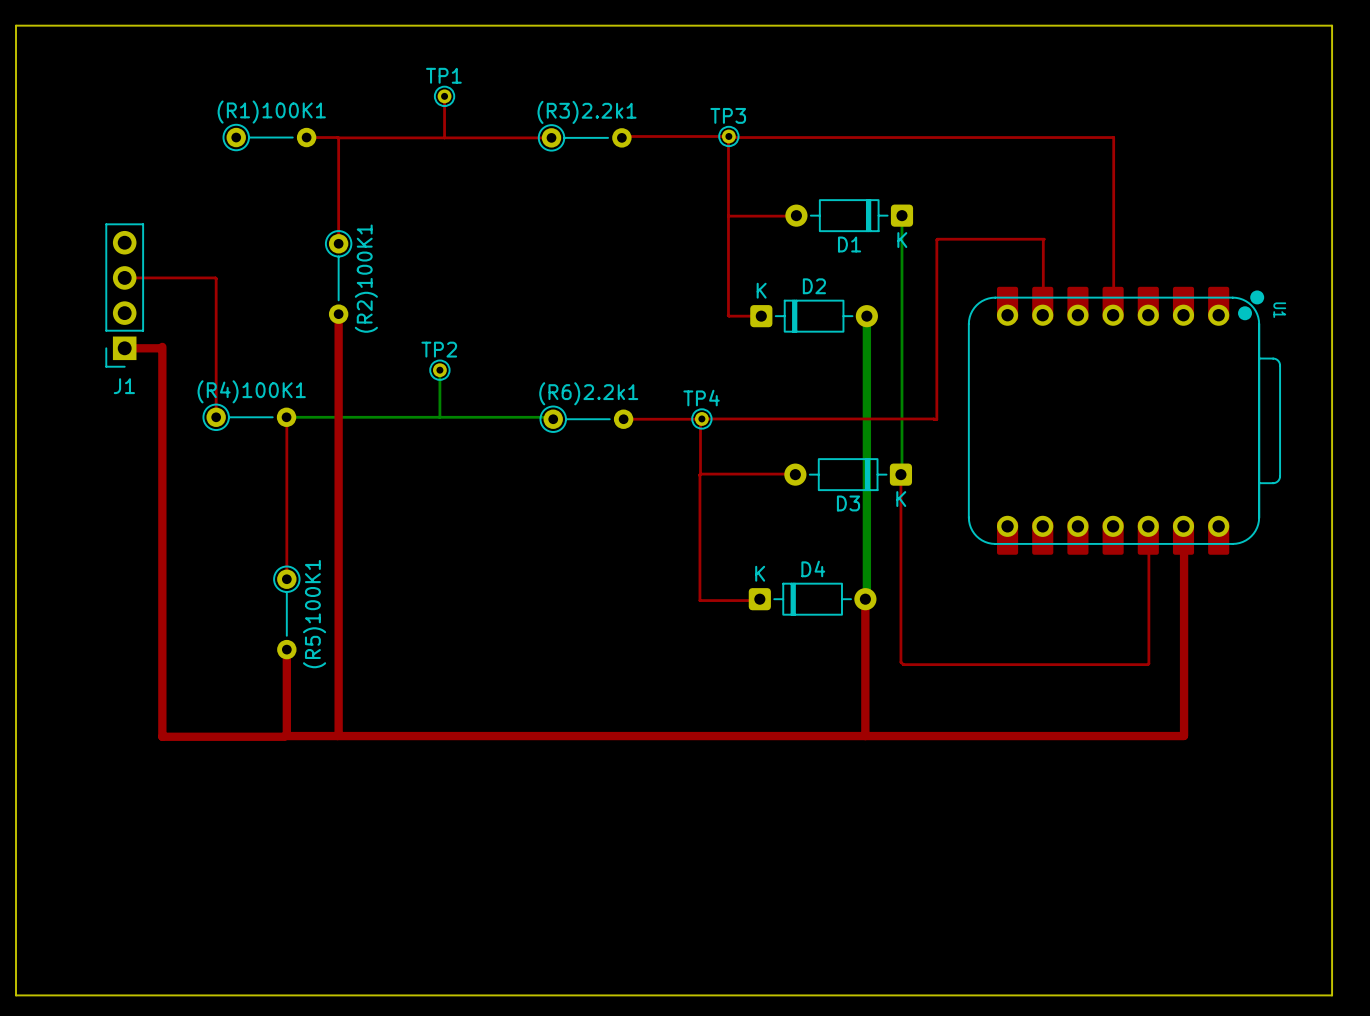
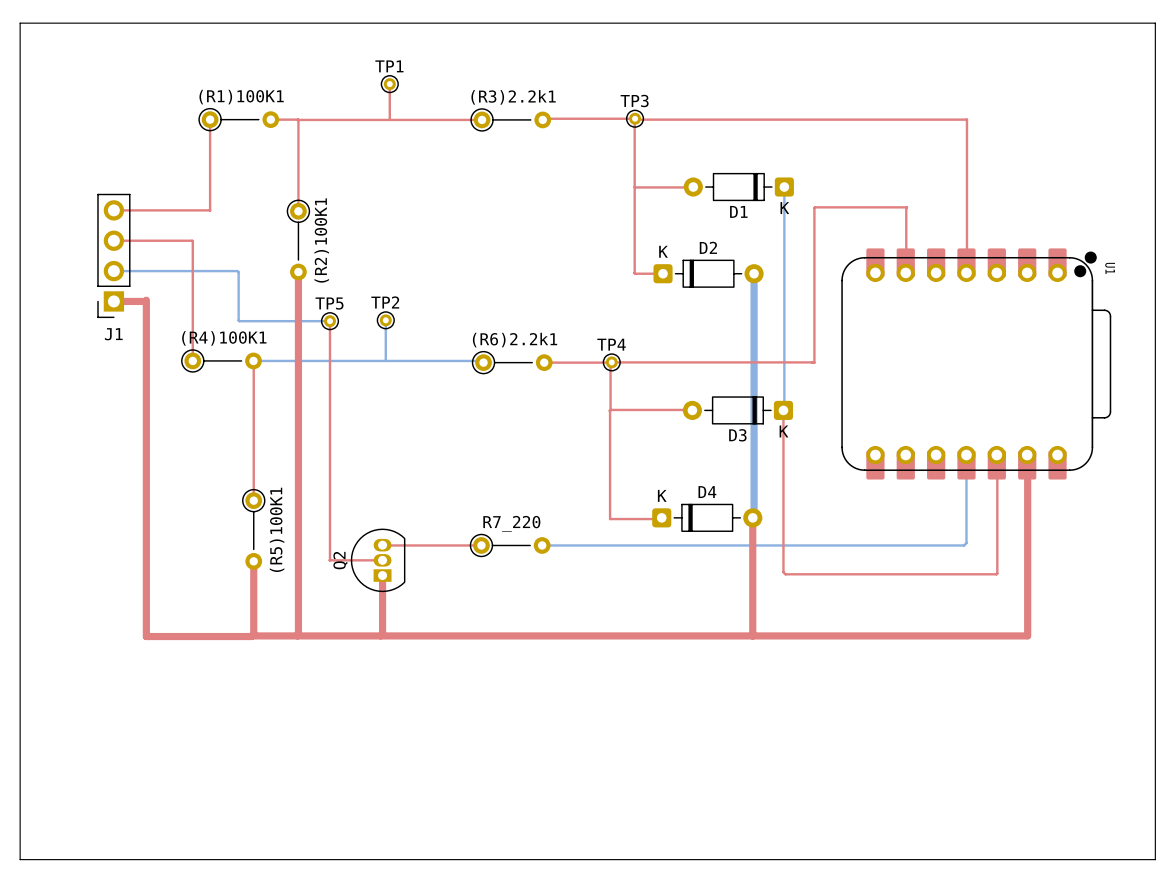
top track: none -> (210, 119) (210, 210) (113, 210)
bottom track: none -> (113, 271) (237, 271) (239, 321) (330, 321)
top track: none -> (330, 321) (329, 560) (382, 560)
TP5: none -> (330, 321)
bottom track: none -> (966, 455) (966, 543) (964, 545) (542, 545)
top track: none -> (382, 545) (481, 545)
R7_220: none -> (510, 545)
Q2: none -> (378, 560)
top track: none -> (382, 575) (382, 634) (380, 635)

